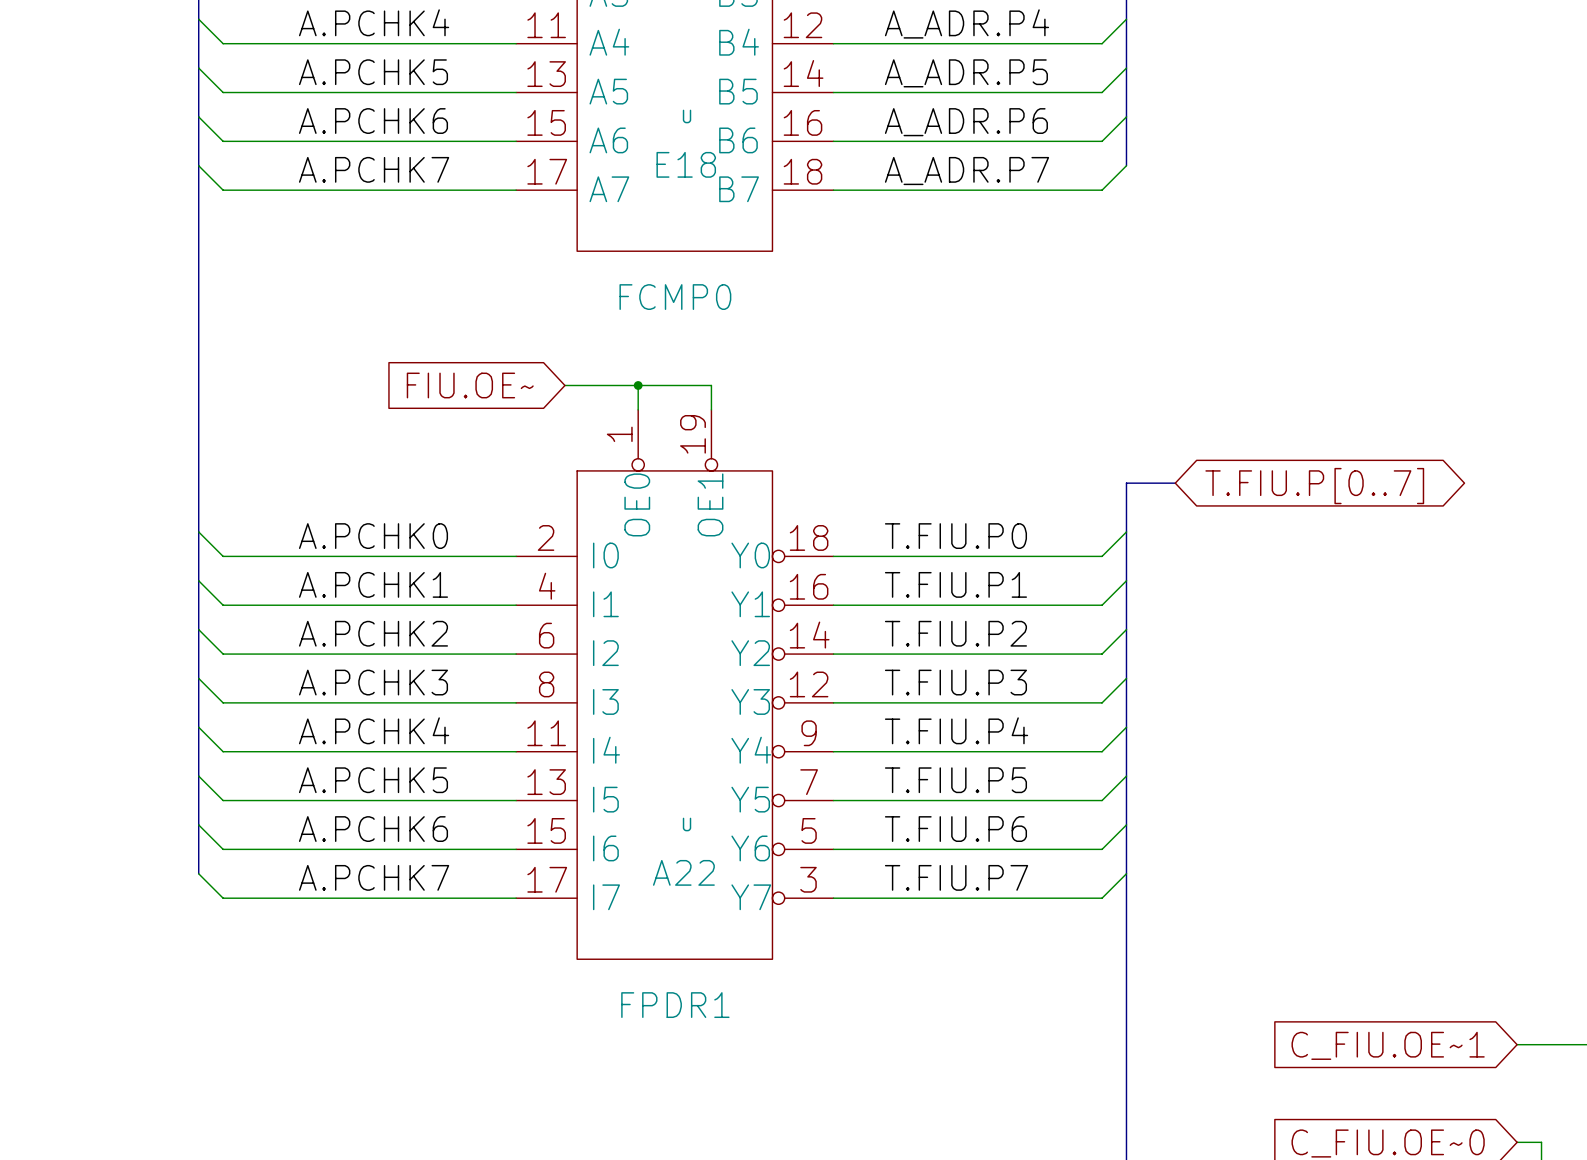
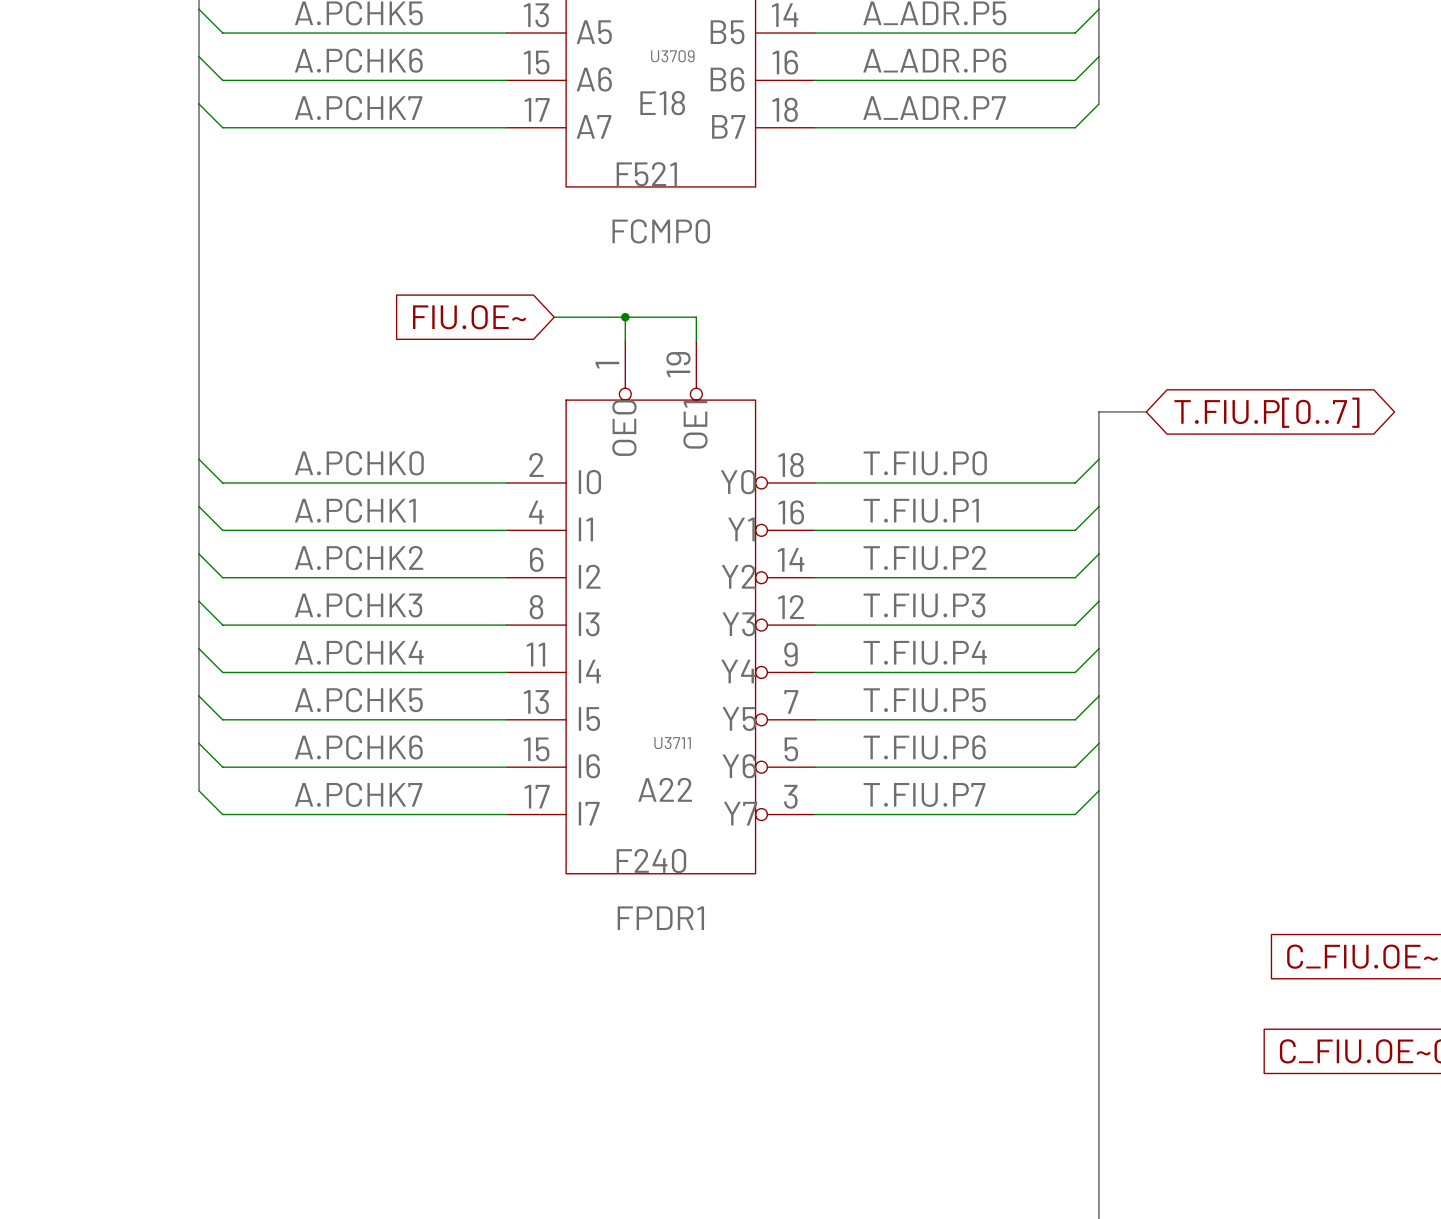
U name: U (687, 116) -> U3709 (672, 56)
U value: none -> F521 (646, 174)
U name: U (687, 824) -> U3711 (672, 743)
U value: none -> F240 (651, 861)

